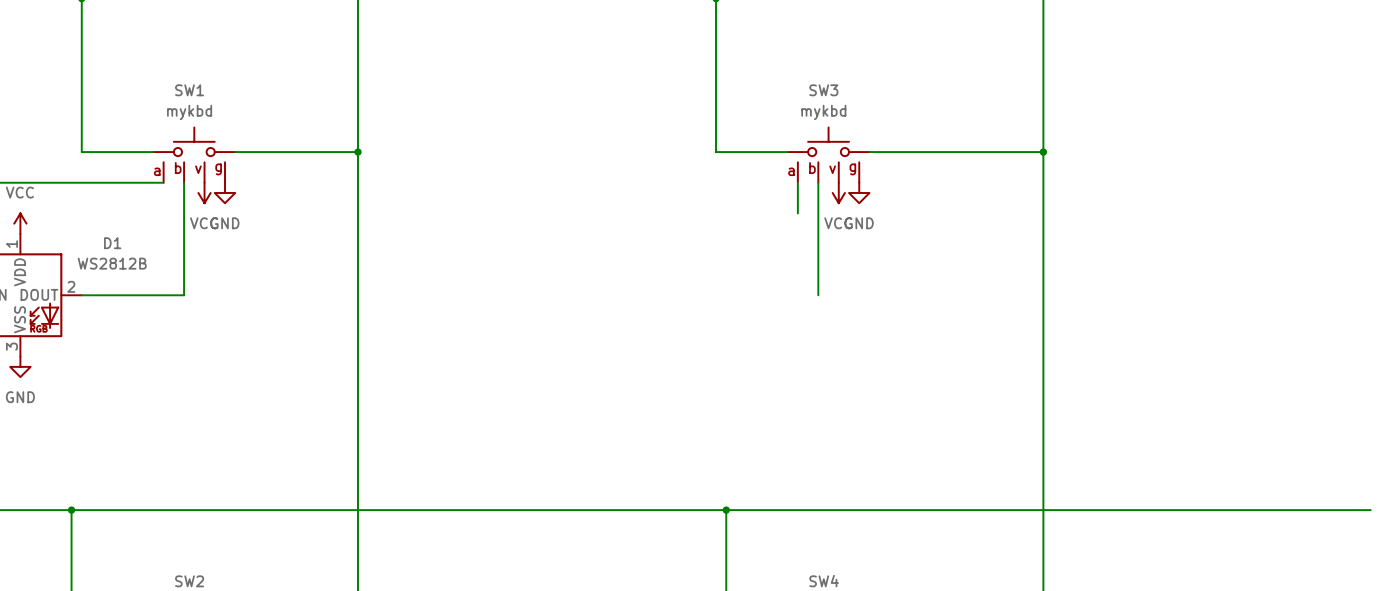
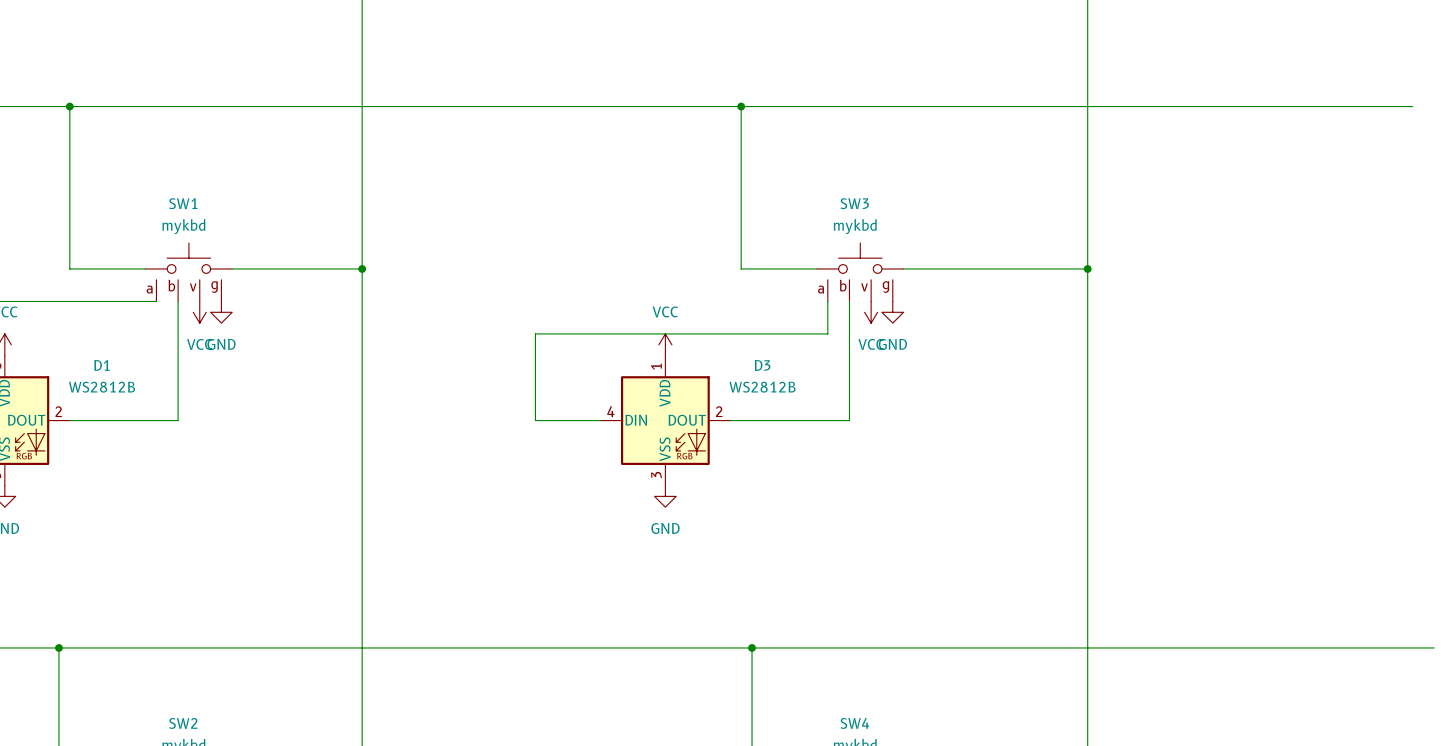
wire: none -> (827, 333) (535, 333) (535, 420) (600, 420)
power symbol: none -> VCC (665, 344)
D3: none -> WS2812B (665, 420)
wire: none -> (730, 420) (849, 420)
power symbol: none -> GND (665, 496)

